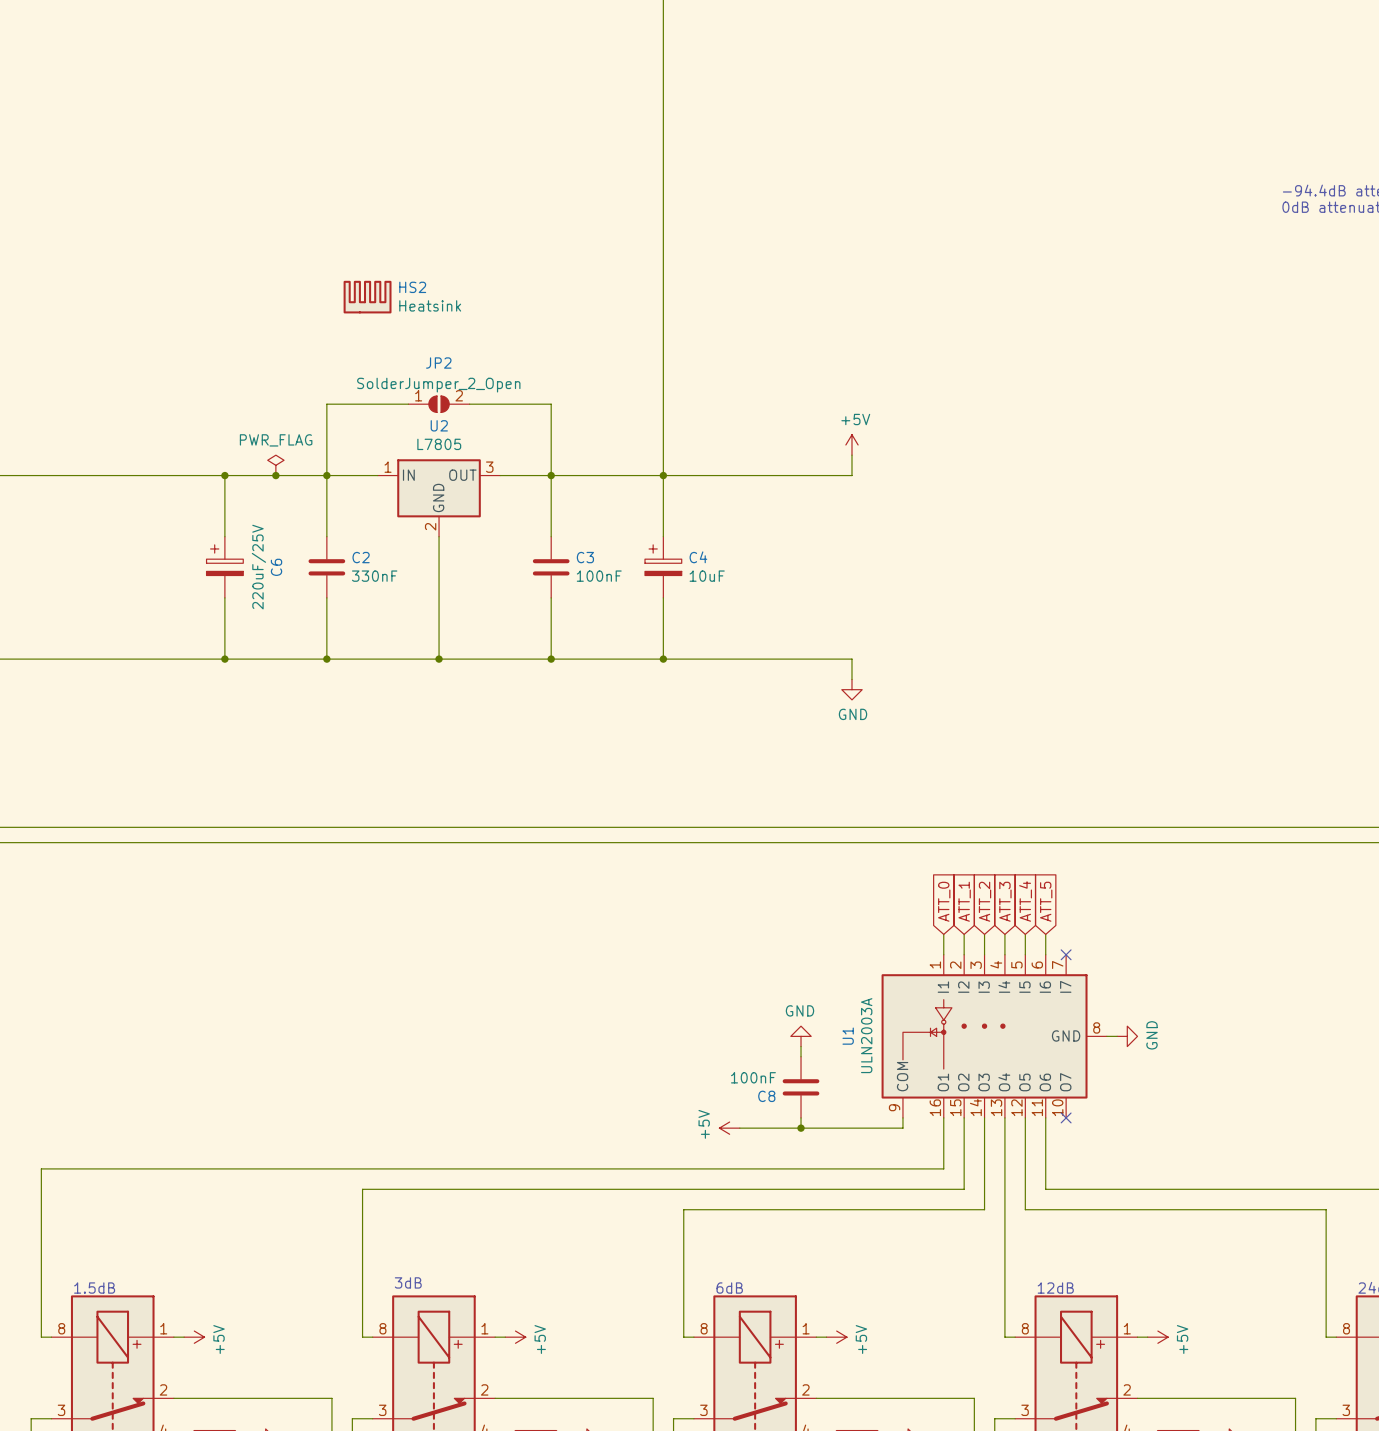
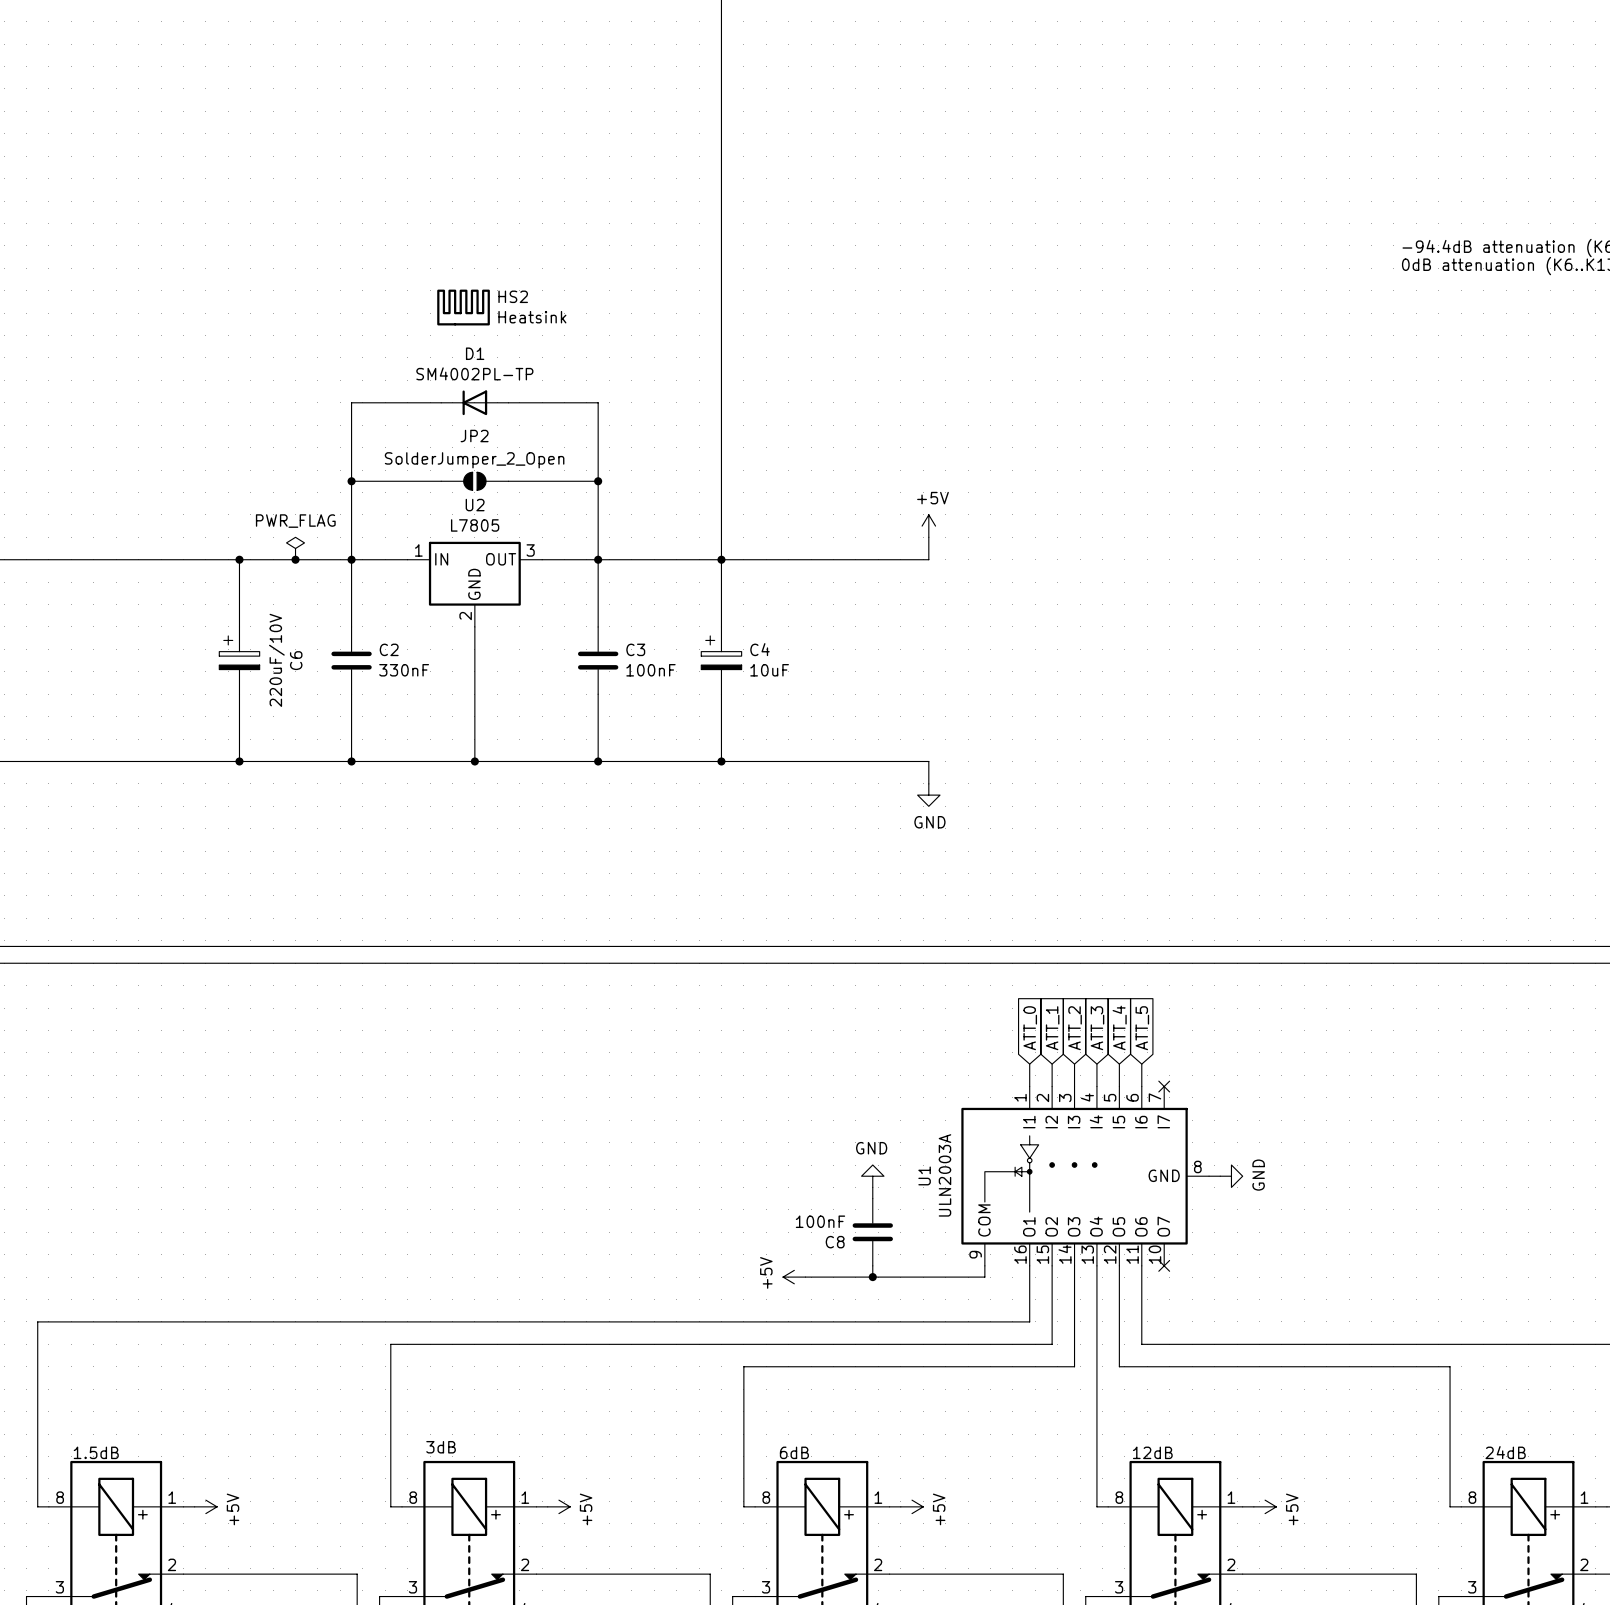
HS2 position: (367, 297) -> (463, 307)
wire: none -> (441, 402) (351, 402) (351, 481)
D1: none -> SM4002PL-TP (474, 402)
wire: none -> (508, 402) (598, 402) (598, 481)
JP2 pin number: 1 (418, 395) -> none
JP2 pin number: 2 (459, 395) -> none
junction: none -> (351, 481)
junction: none -> (598, 481)
C6 value: 220uF/25V (258, 567) -> 220uF/10V (276, 660)

